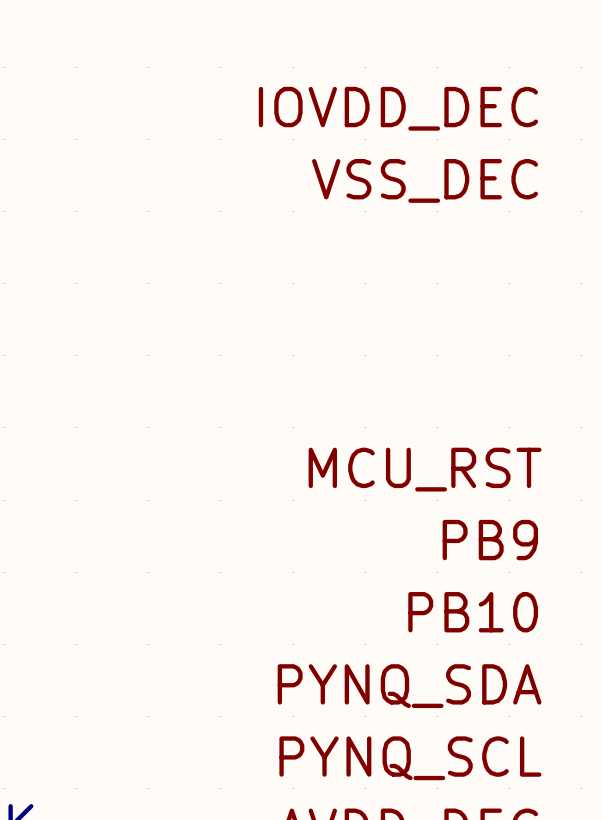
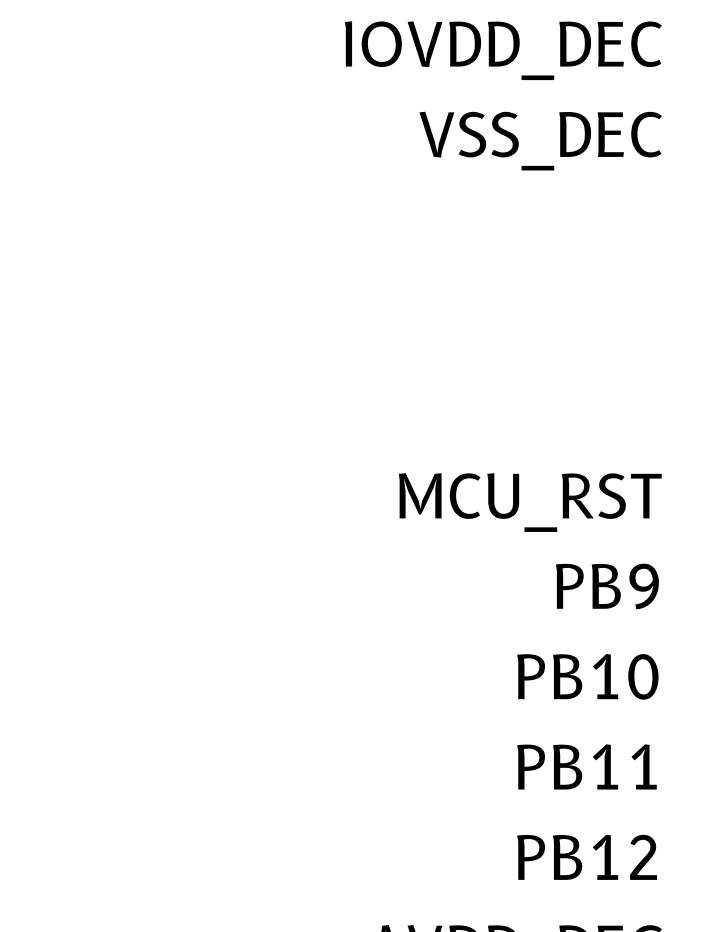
label: PYNQ_SDA (409, 686) -> PB11 (587, 766)
label: PYNQ_SCL (410, 758) -> PB12 (587, 857)

